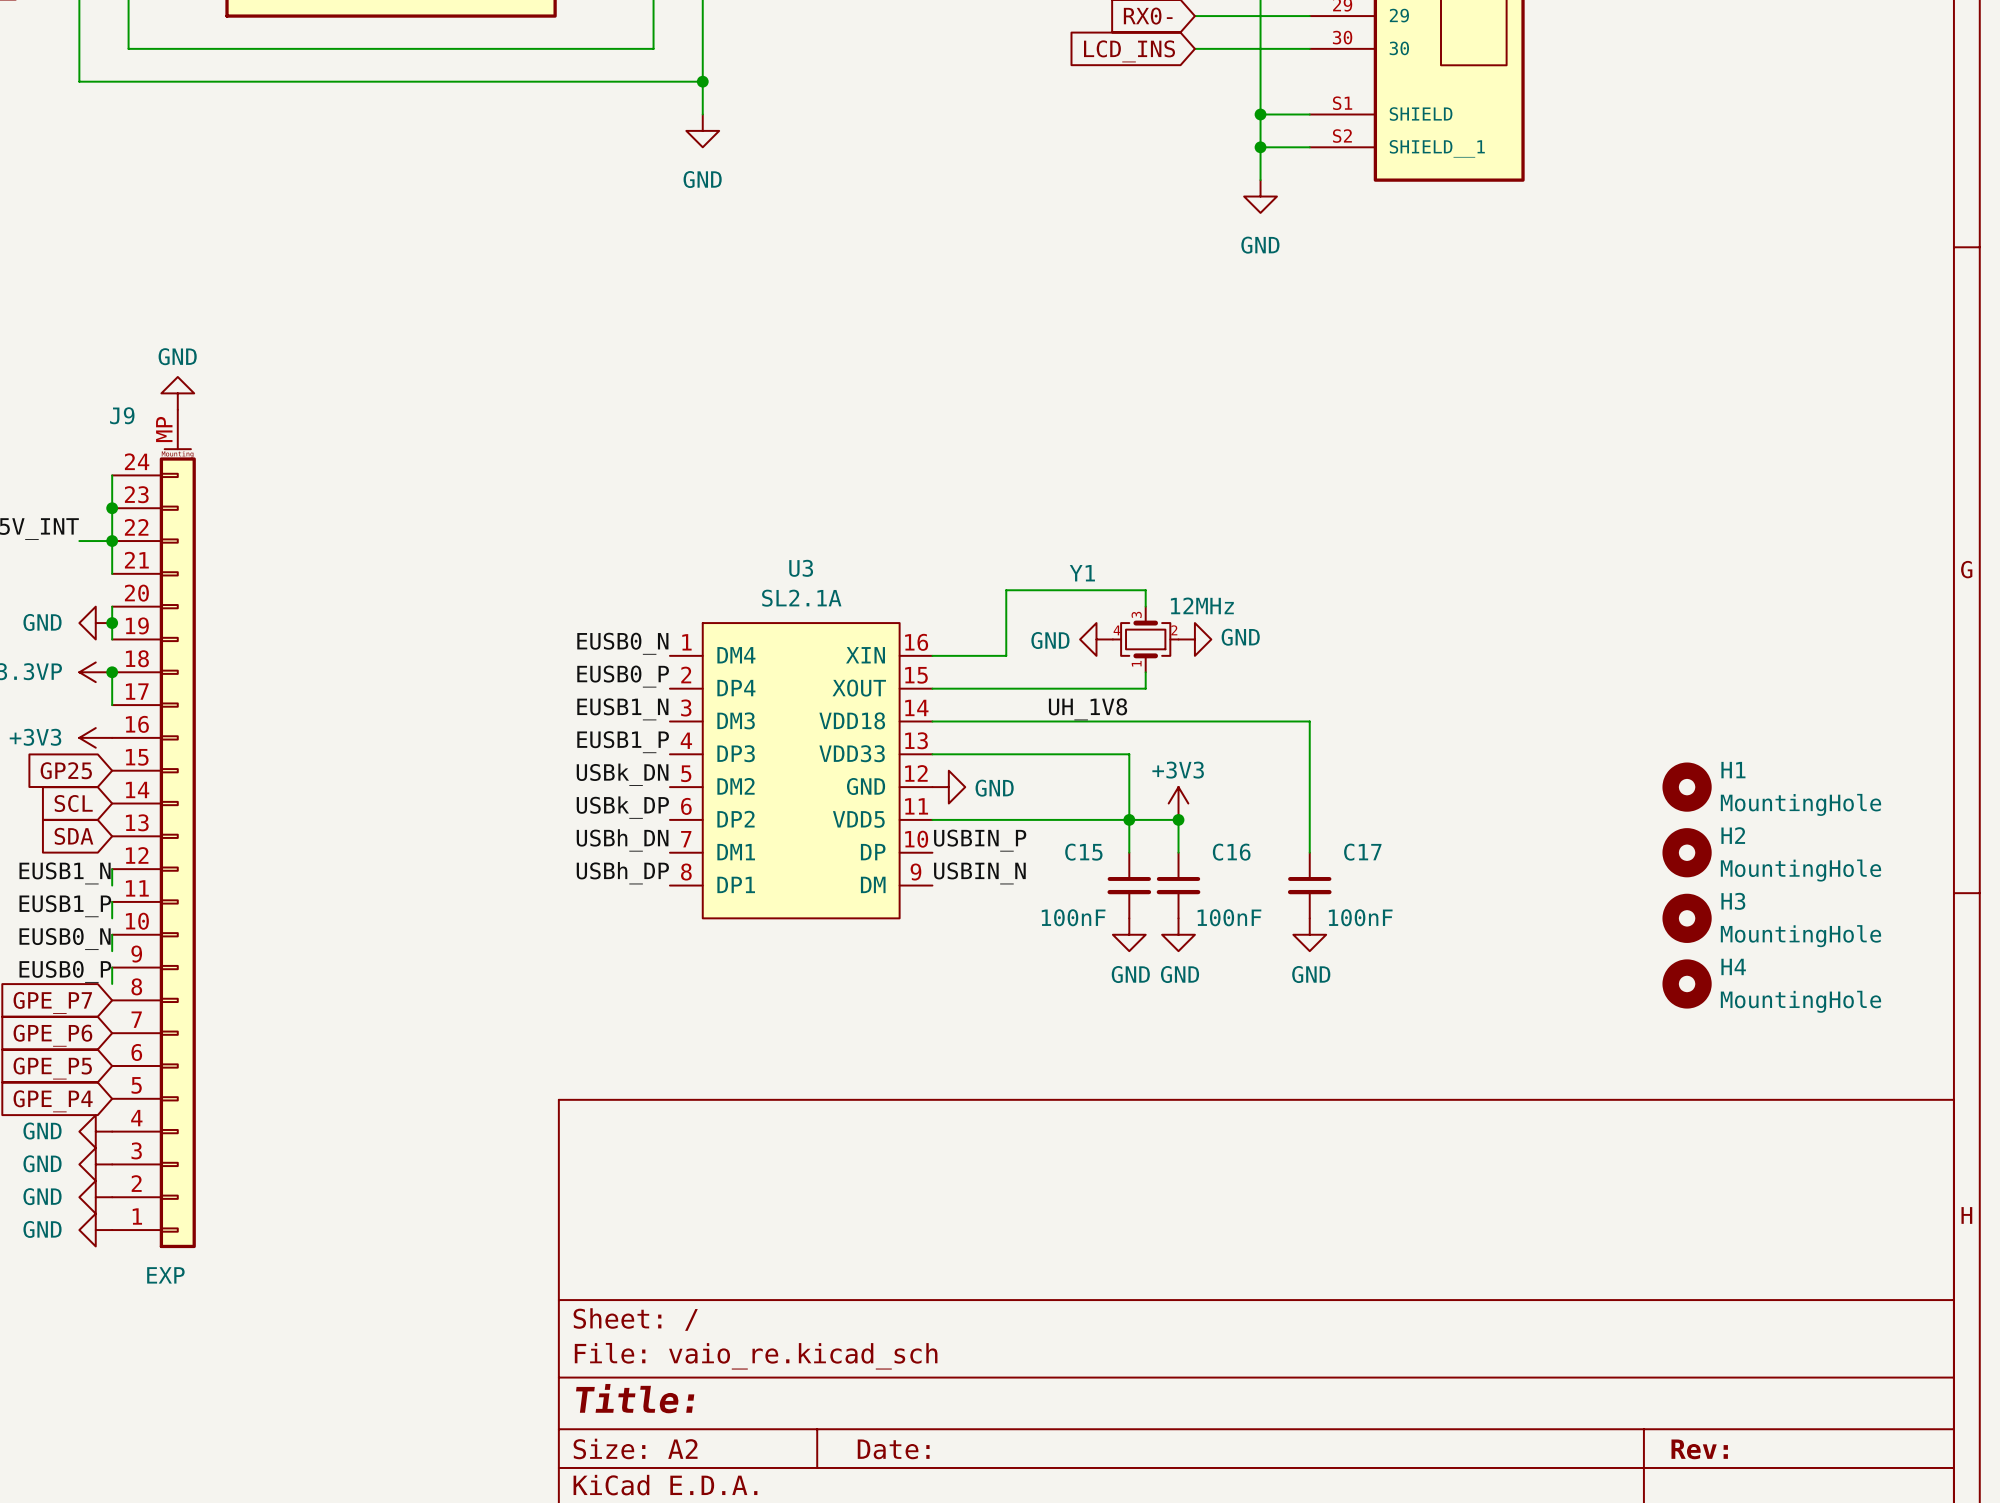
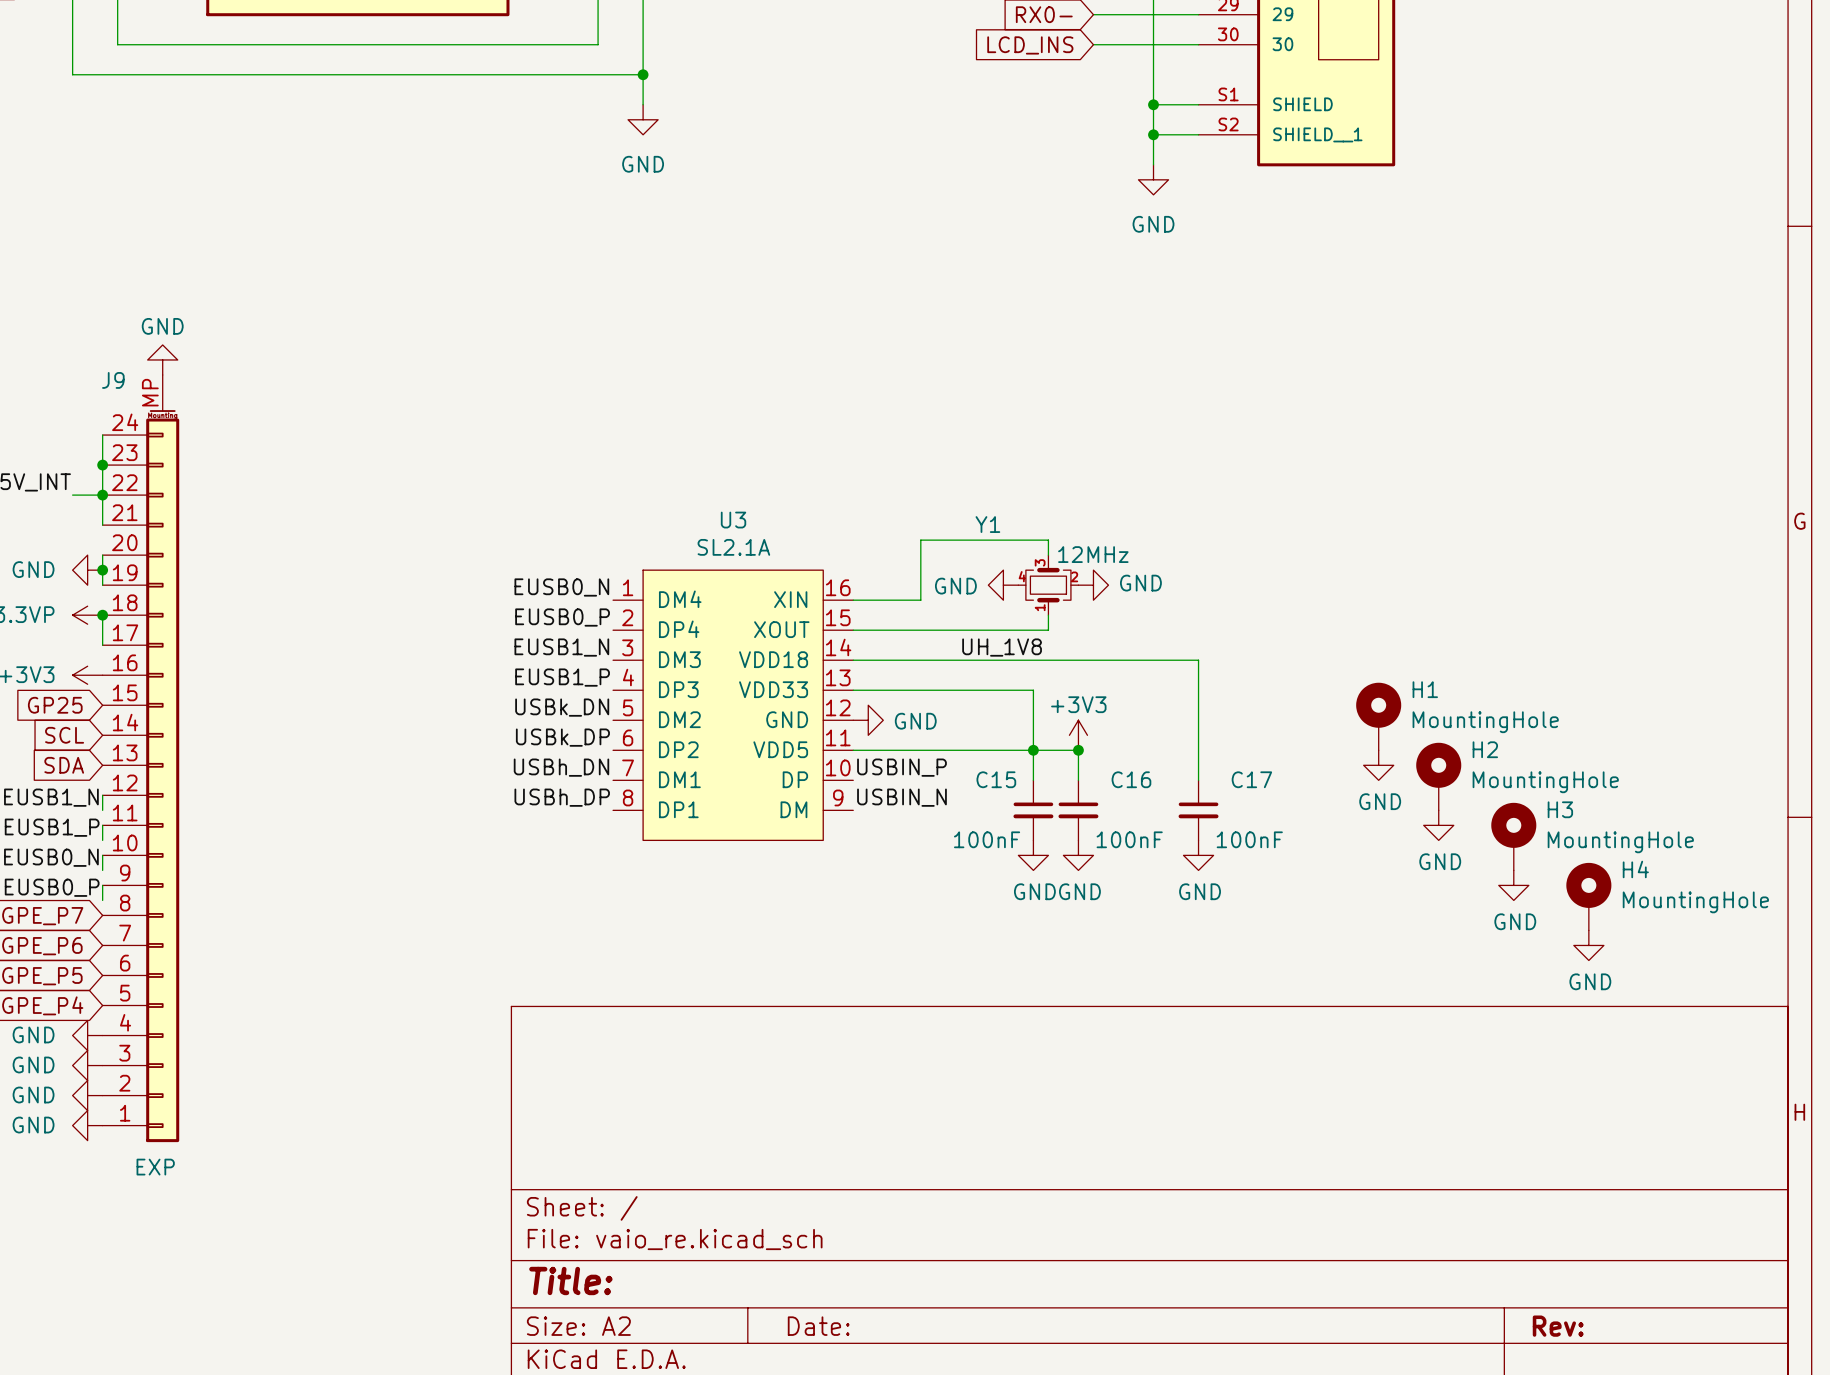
H1 symbol: [1662, 762, 1712, 812] -> [1356, 682, 1402, 751]
H2 symbol: [1662, 828, 1712, 878] -> [1416, 742, 1462, 811]
power symbol: none -> GND (1378, 765)
H3 symbol: [1662, 893, 1712, 943] -> [1491, 802, 1537, 871]
power symbol: none -> GND (1438, 825)
H4 symbol: [1662, 959, 1712, 1009] -> [1566, 862, 1612, 931]
power symbol: none -> GND (1513, 885)
power symbol: none -> GND (1588, 945)

